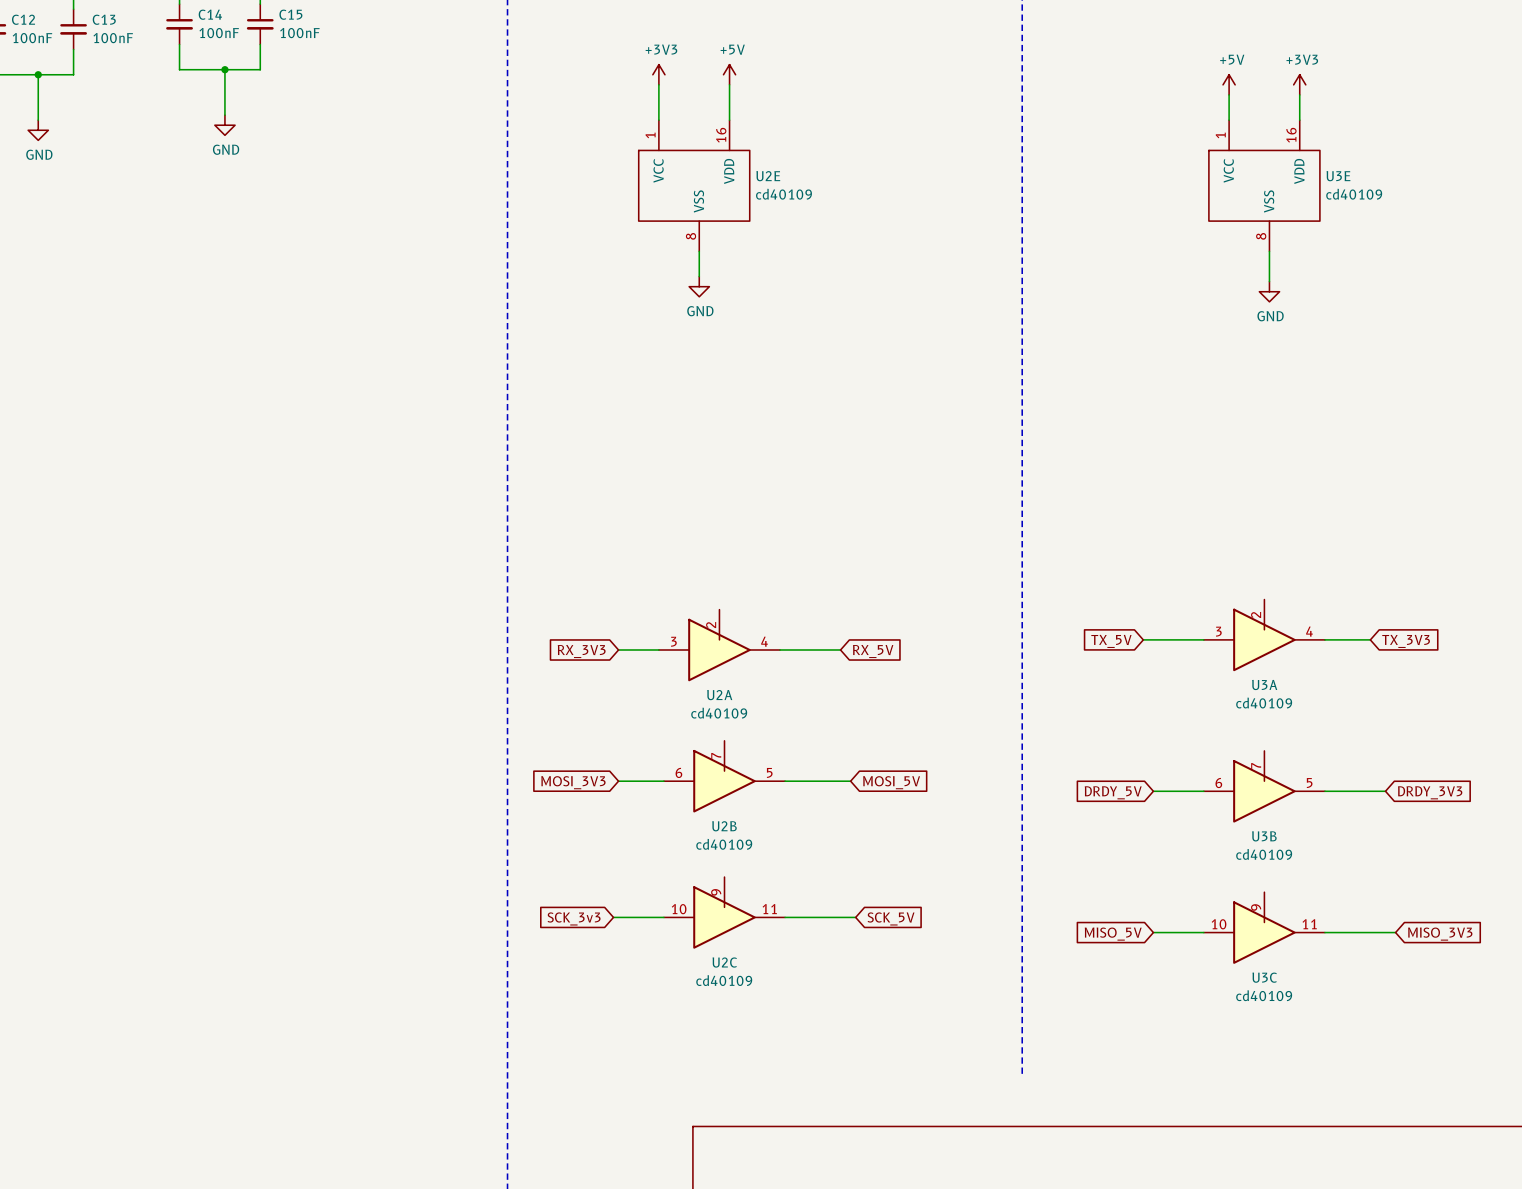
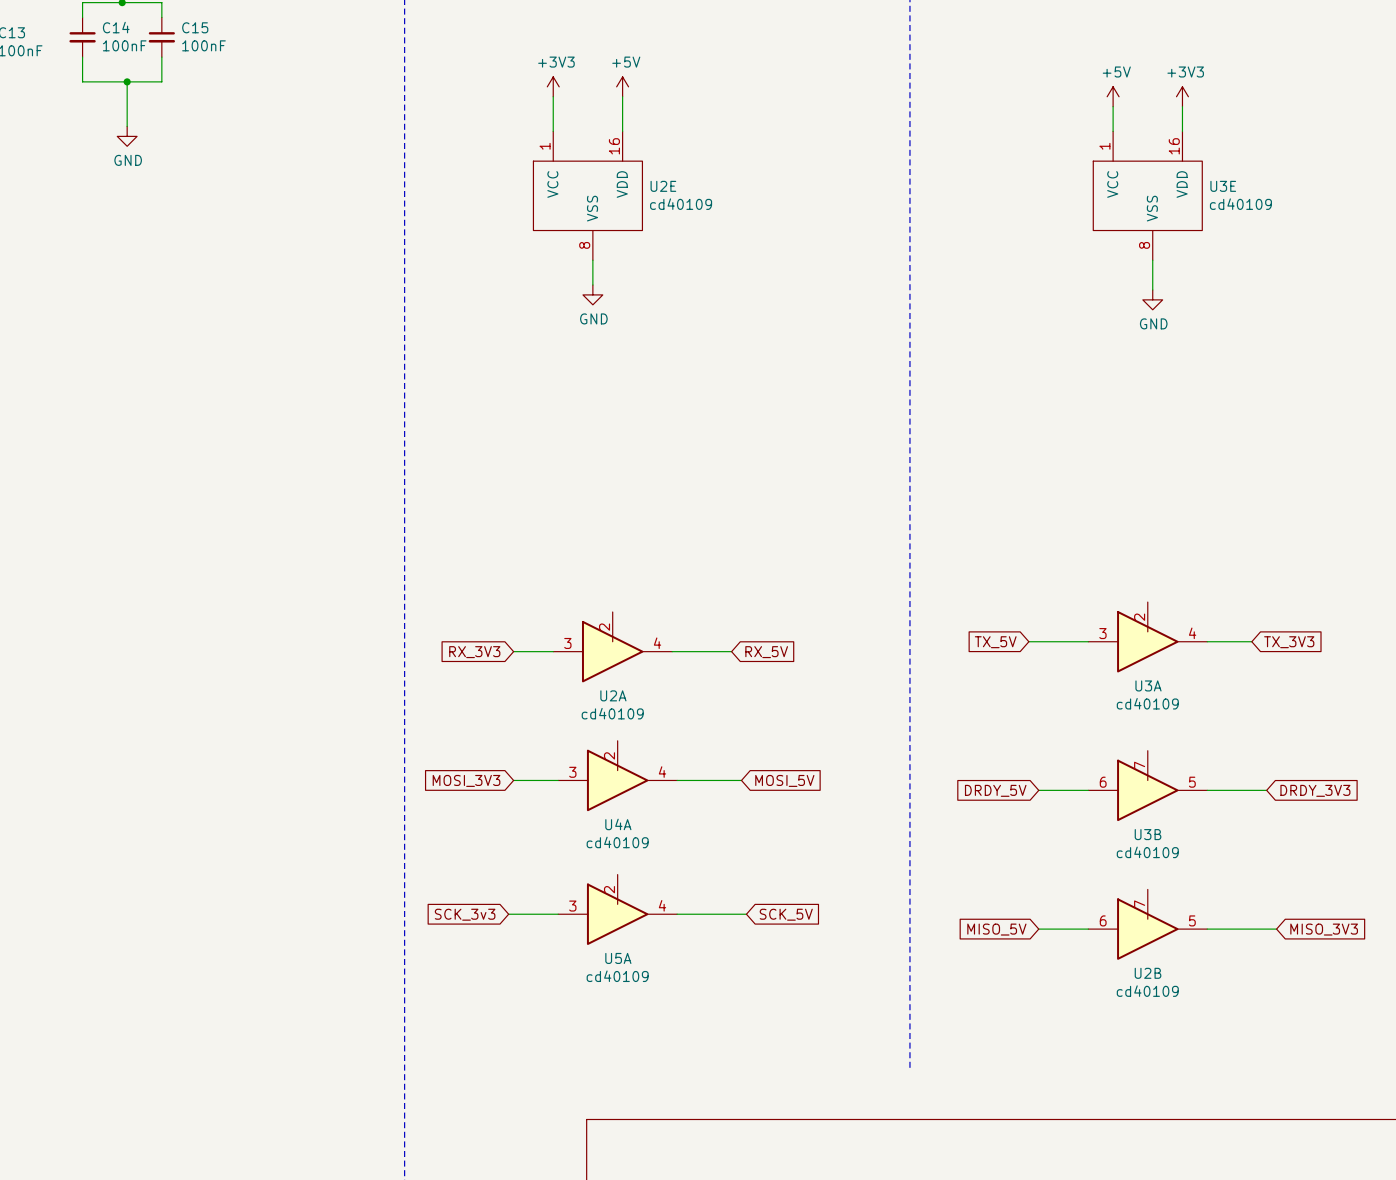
U2B position: (724, 776) -> (1147, 924)
U4A: none -> cd40109 (617, 776)
U2C pin number: 9 (716, 892) -> 2 (609, 889)
U2C pin number: 10 (679, 909) -> 3 (572, 906)
U2C pin number: 11 (769, 909) -> 4 (662, 905)
U3C: cd40109 (1264, 928) -> none
U2C name: U2C (724, 962) -> U5A (618, 958)

